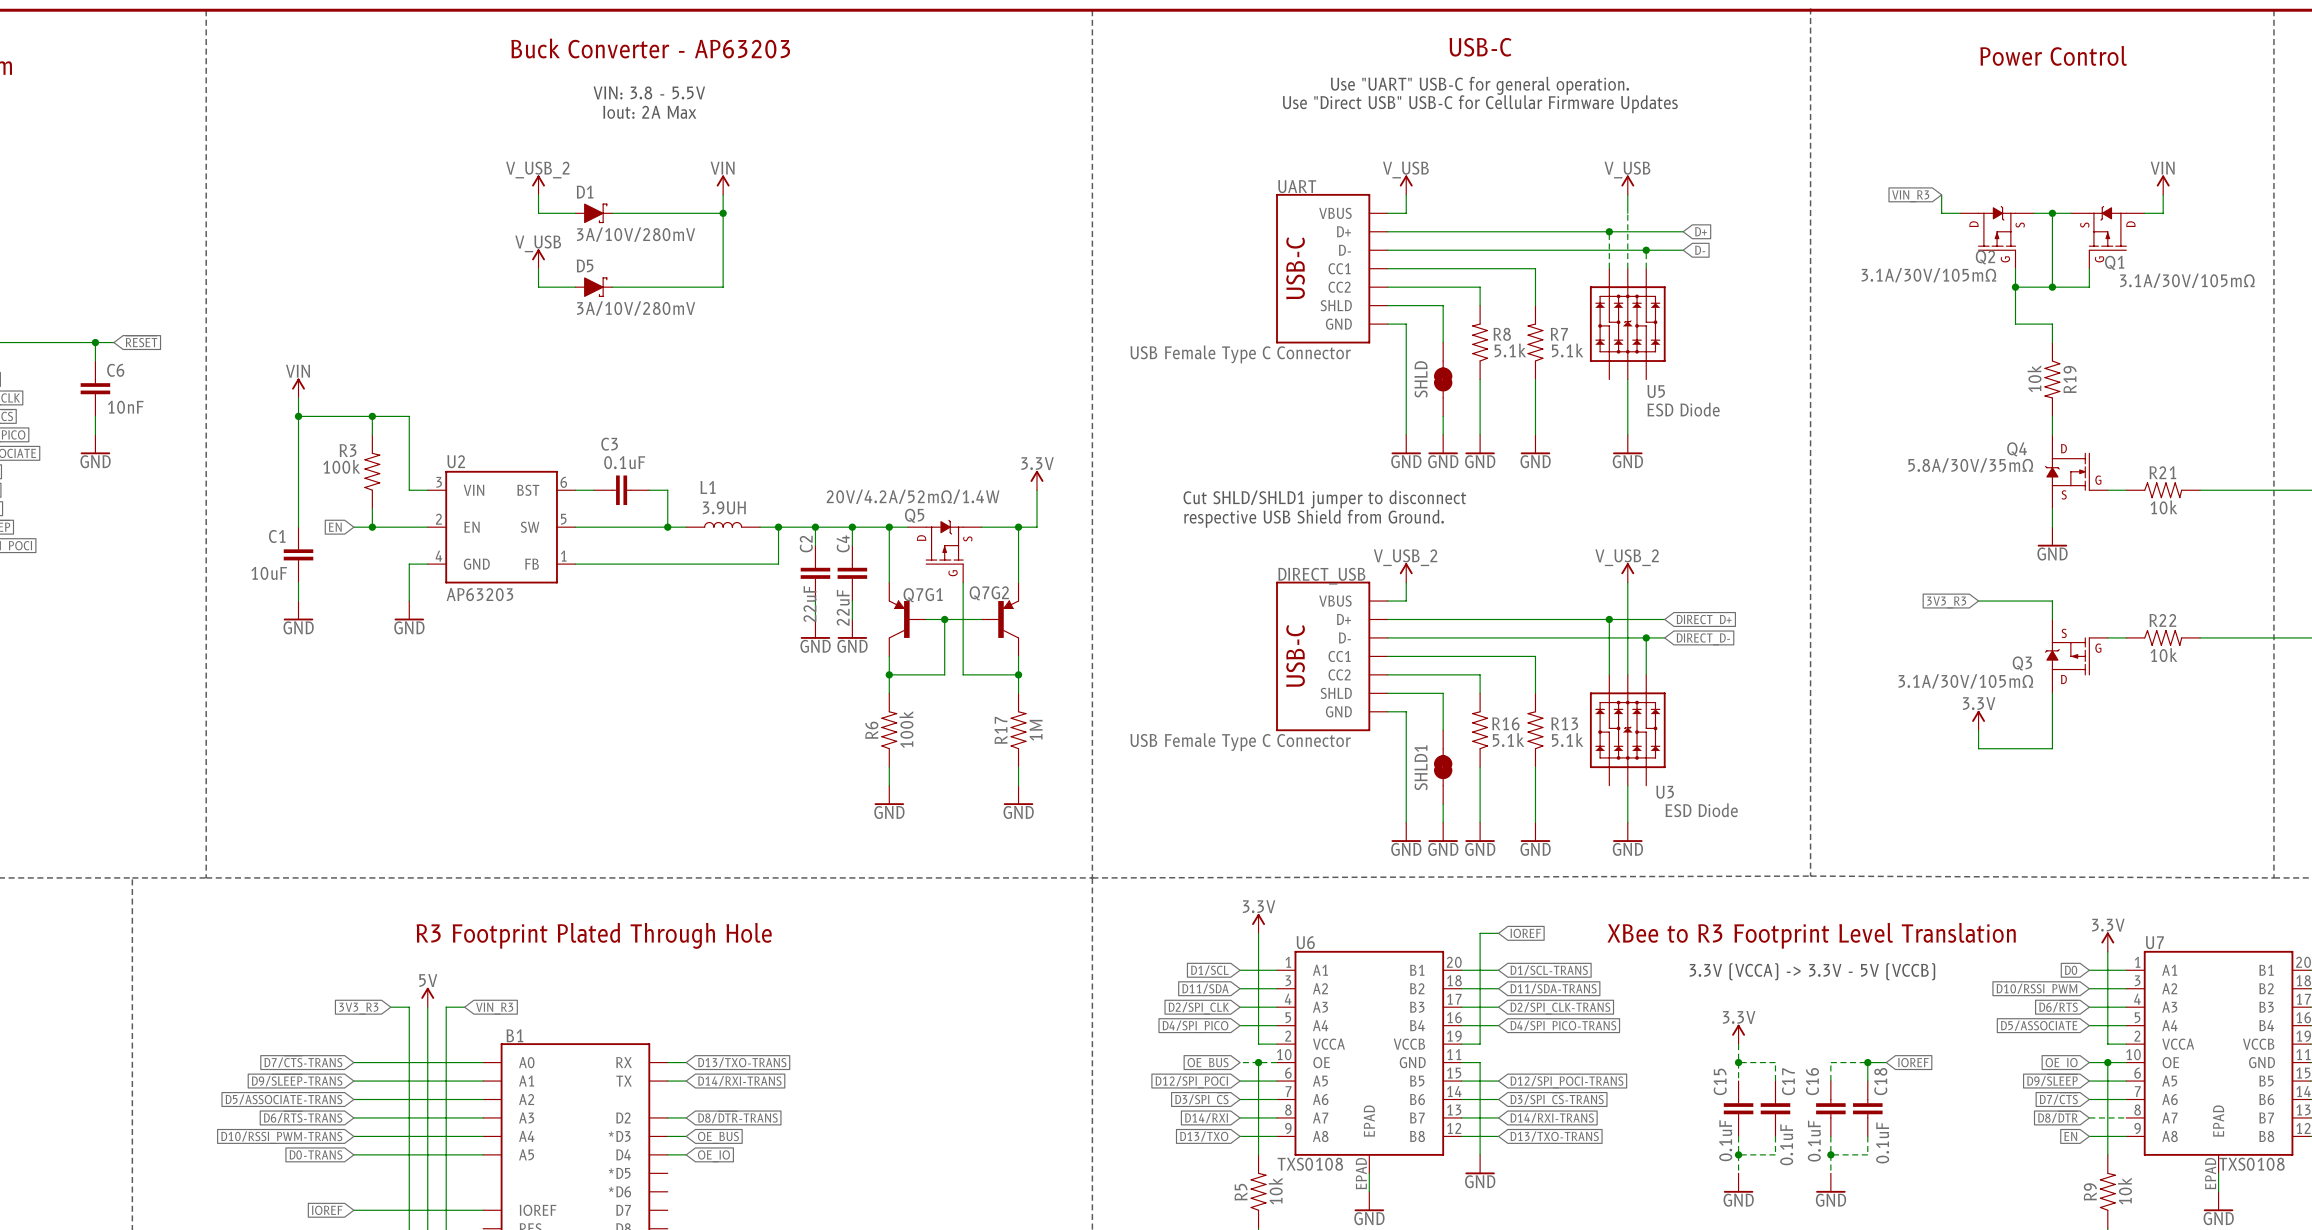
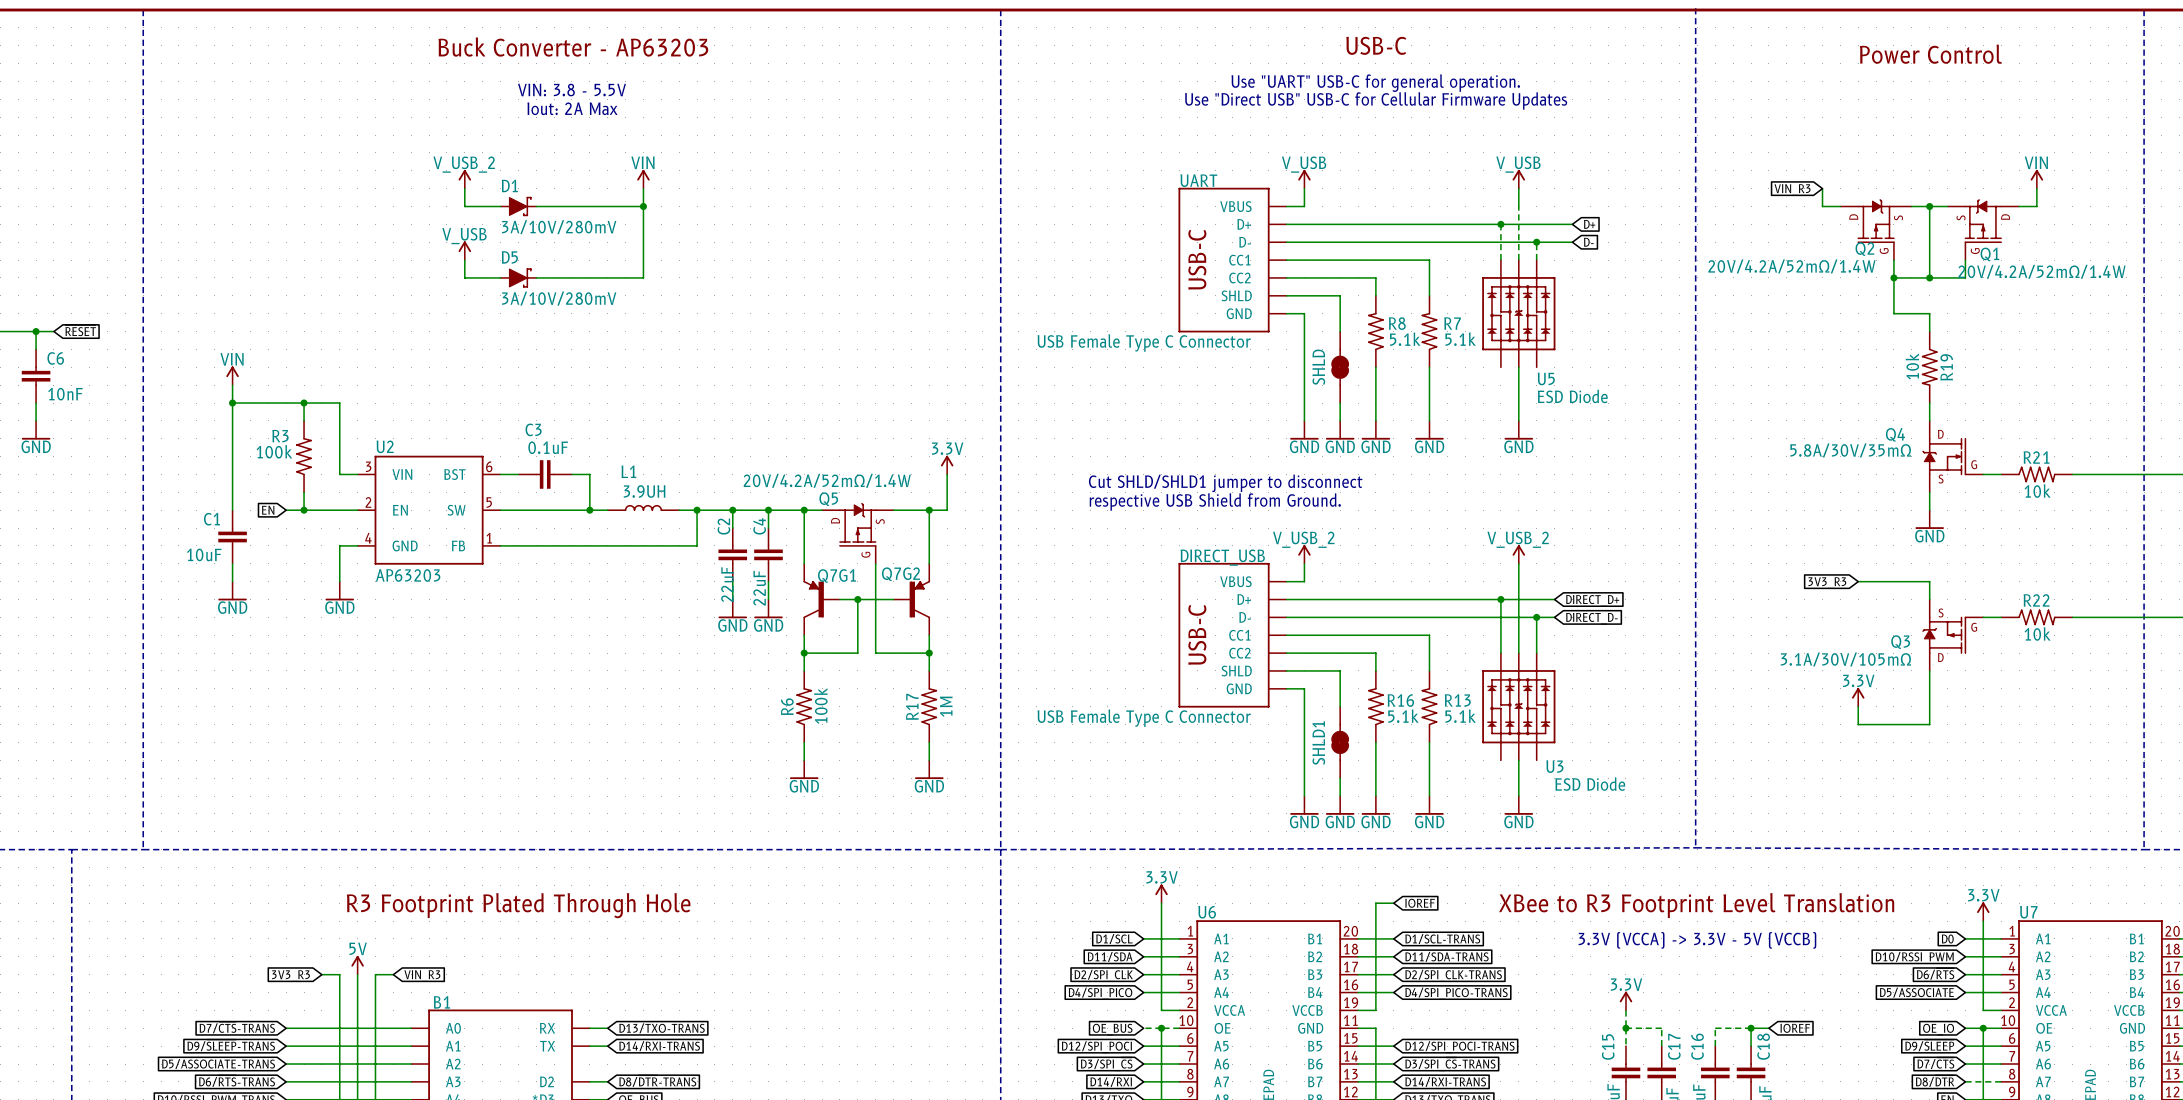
Q2 value: 3.1A/30V/105mΩ (1928, 275) -> 20V/4.2A/52mΩ/1.4W (1791, 266)
Q1 value: 3.1A/30V/105mΩ (2187, 280) -> 20V/4.2A/52mΩ/1.4W (2042, 271)

